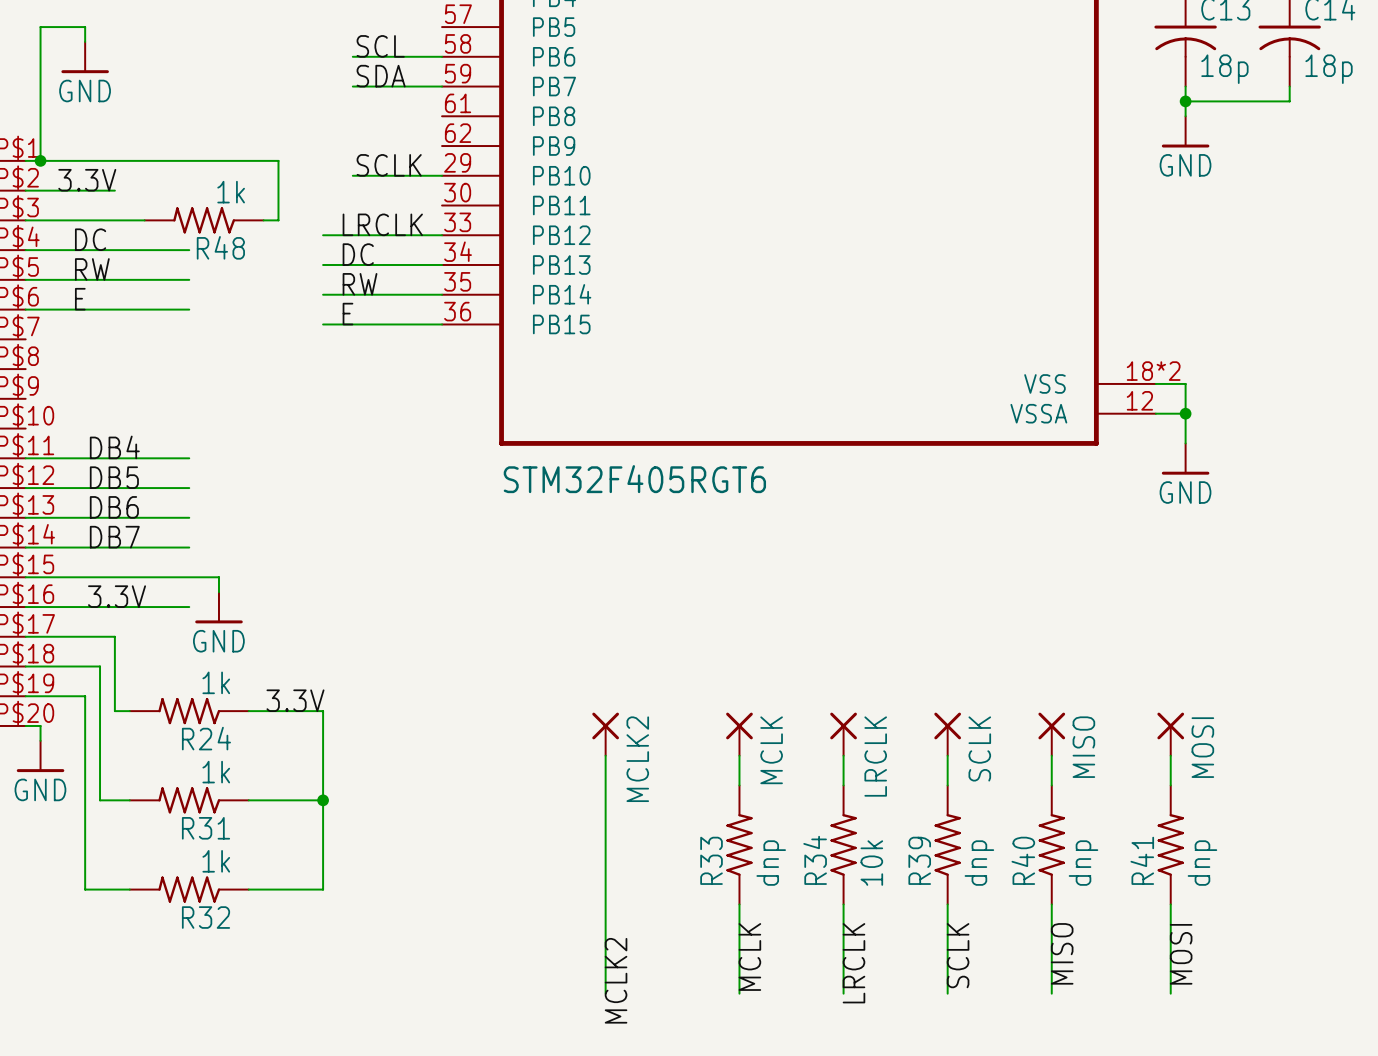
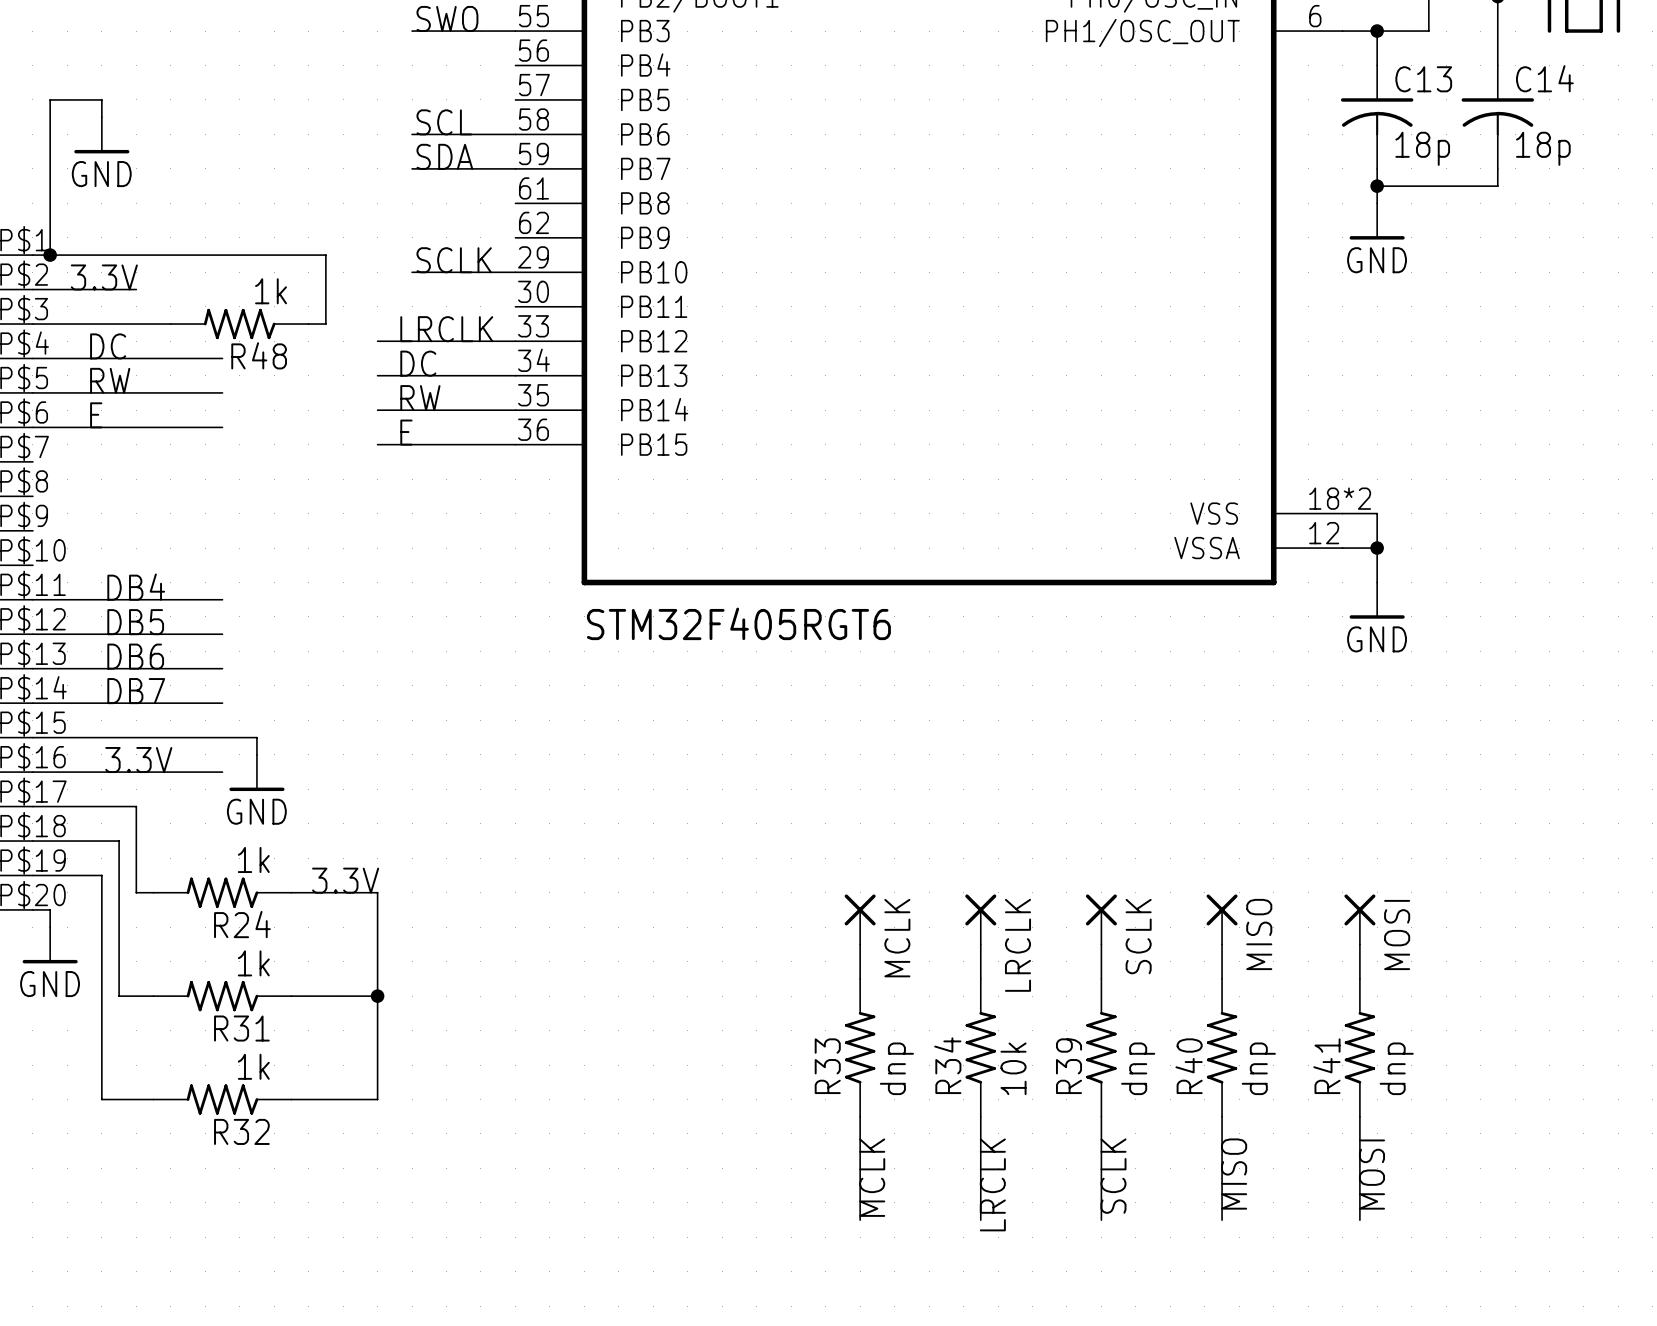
MCLK2: (605, 734) -> none
wire: (605, 755) (605, 993) -> none
label: MCLK2 (616, 980) -> none

